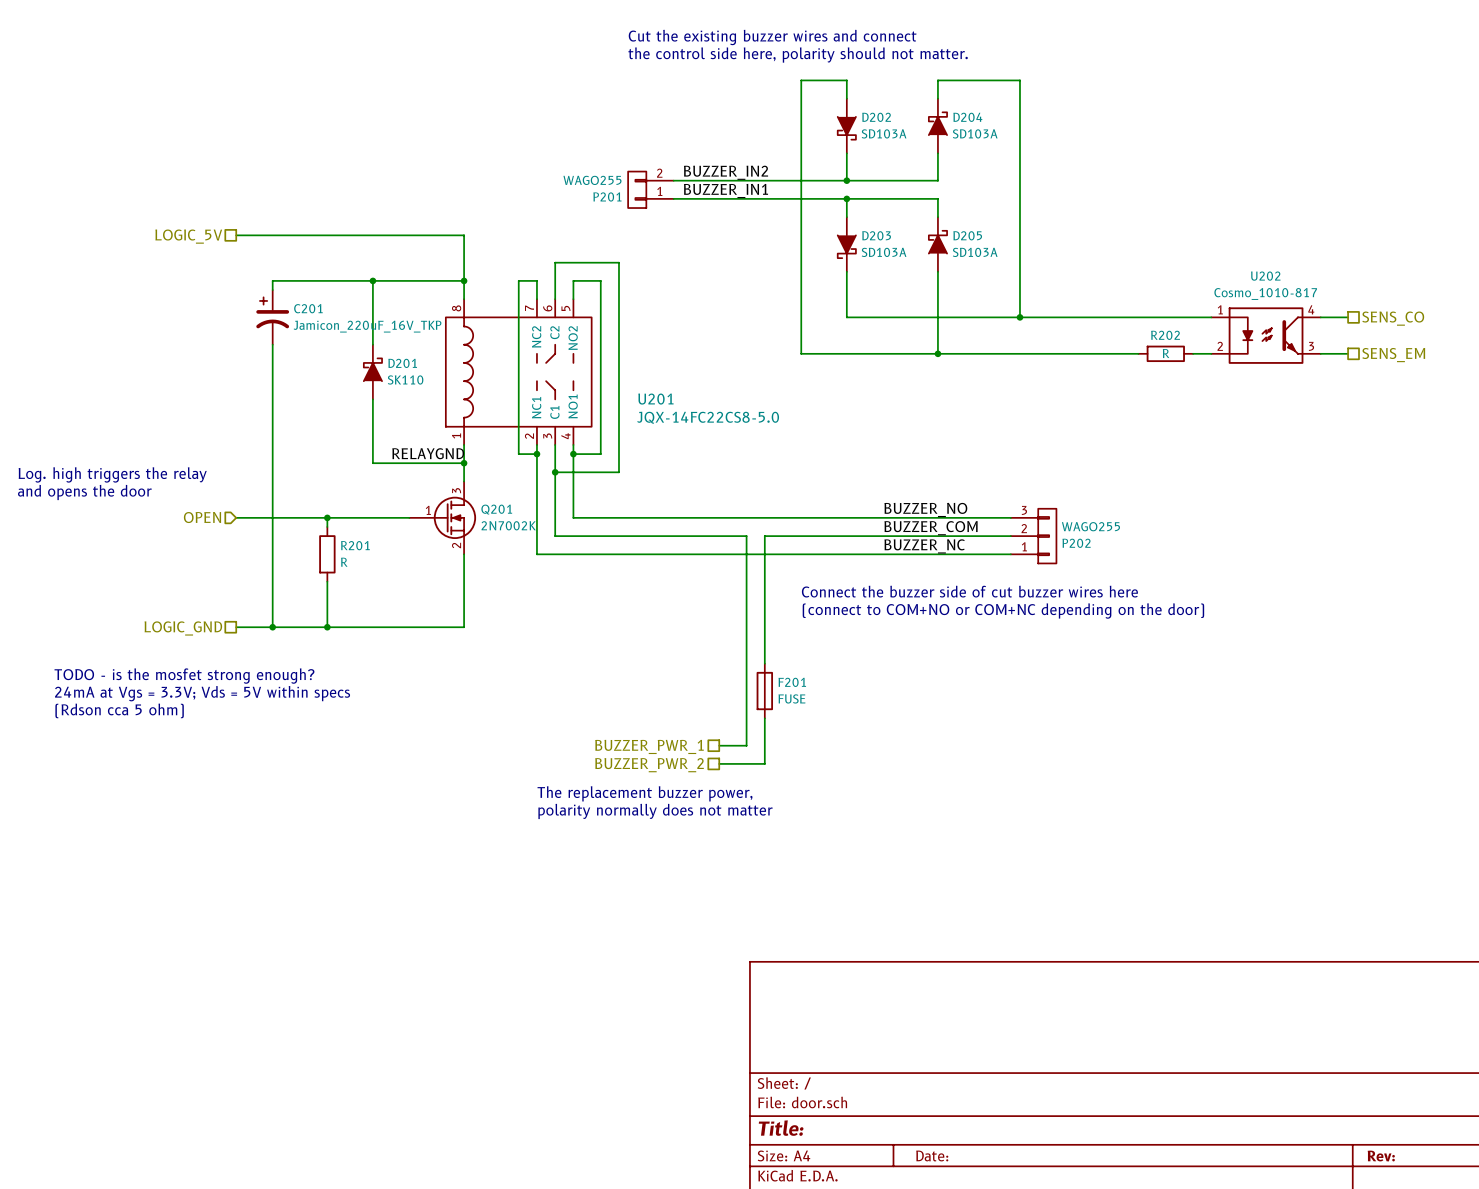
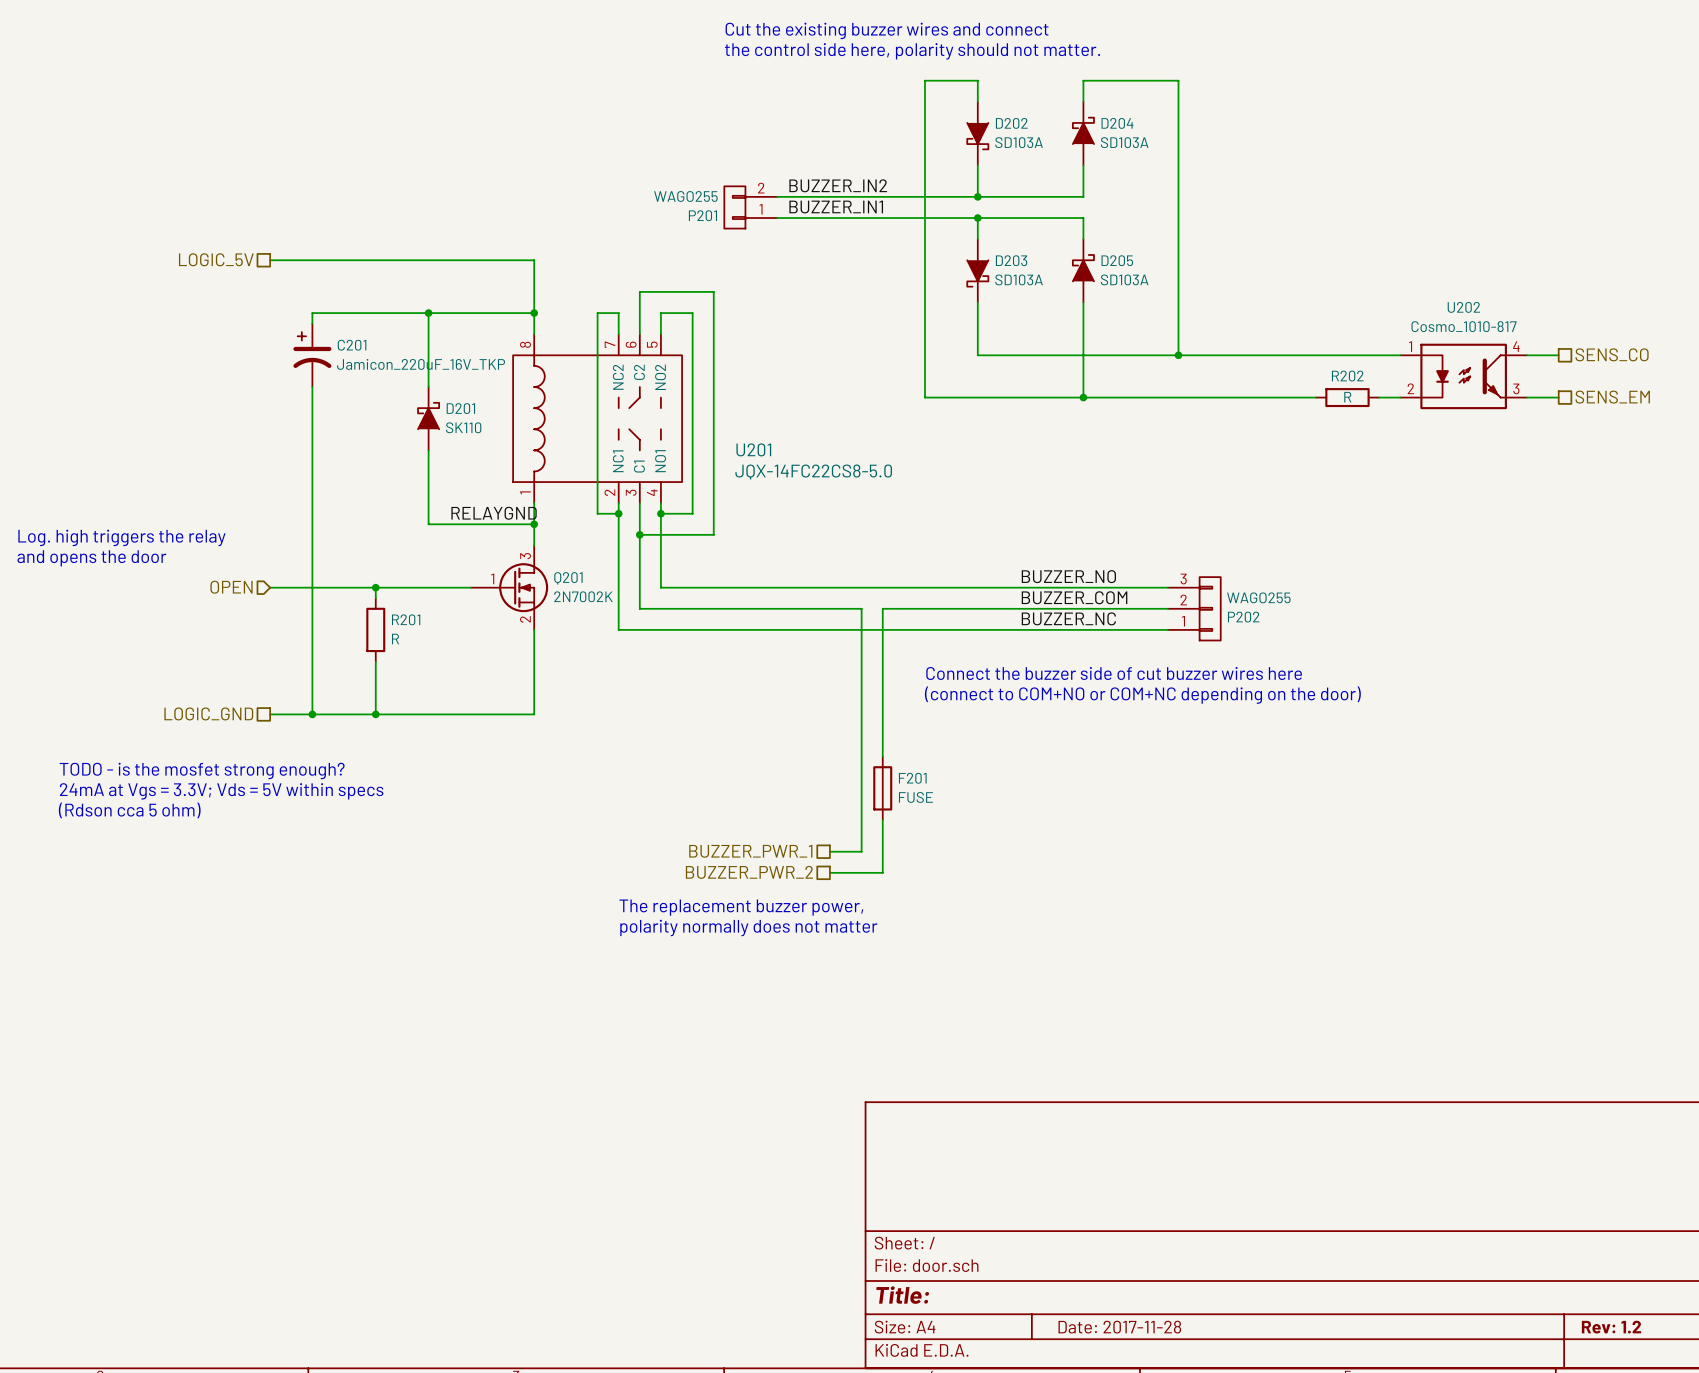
title block: Date: (932, 1155) -> Date: 2017-11-28 (1119, 1327)
title block: Rev: (1381, 1156) -> Rev: 1.2 (1611, 1327)

